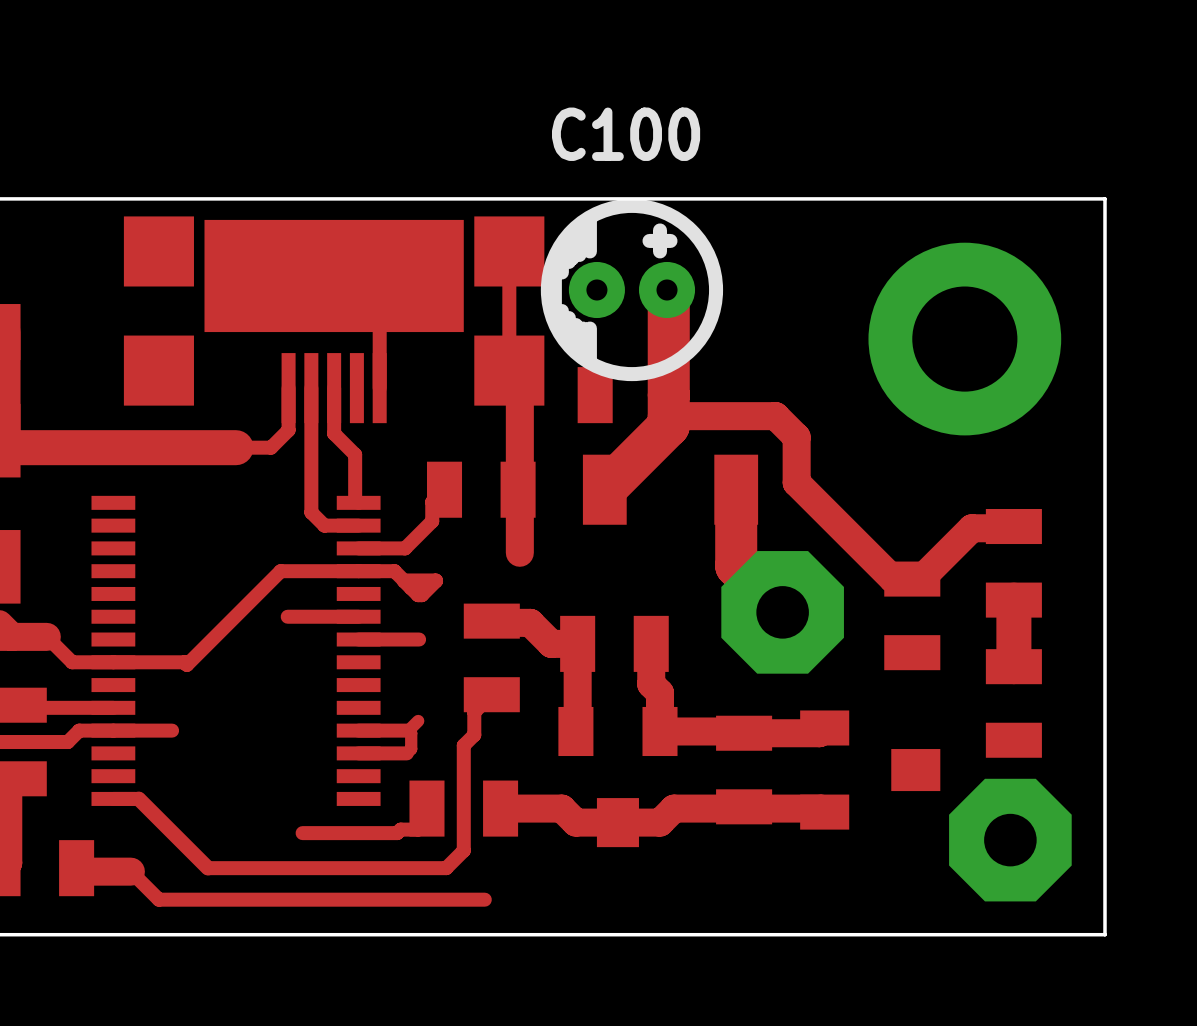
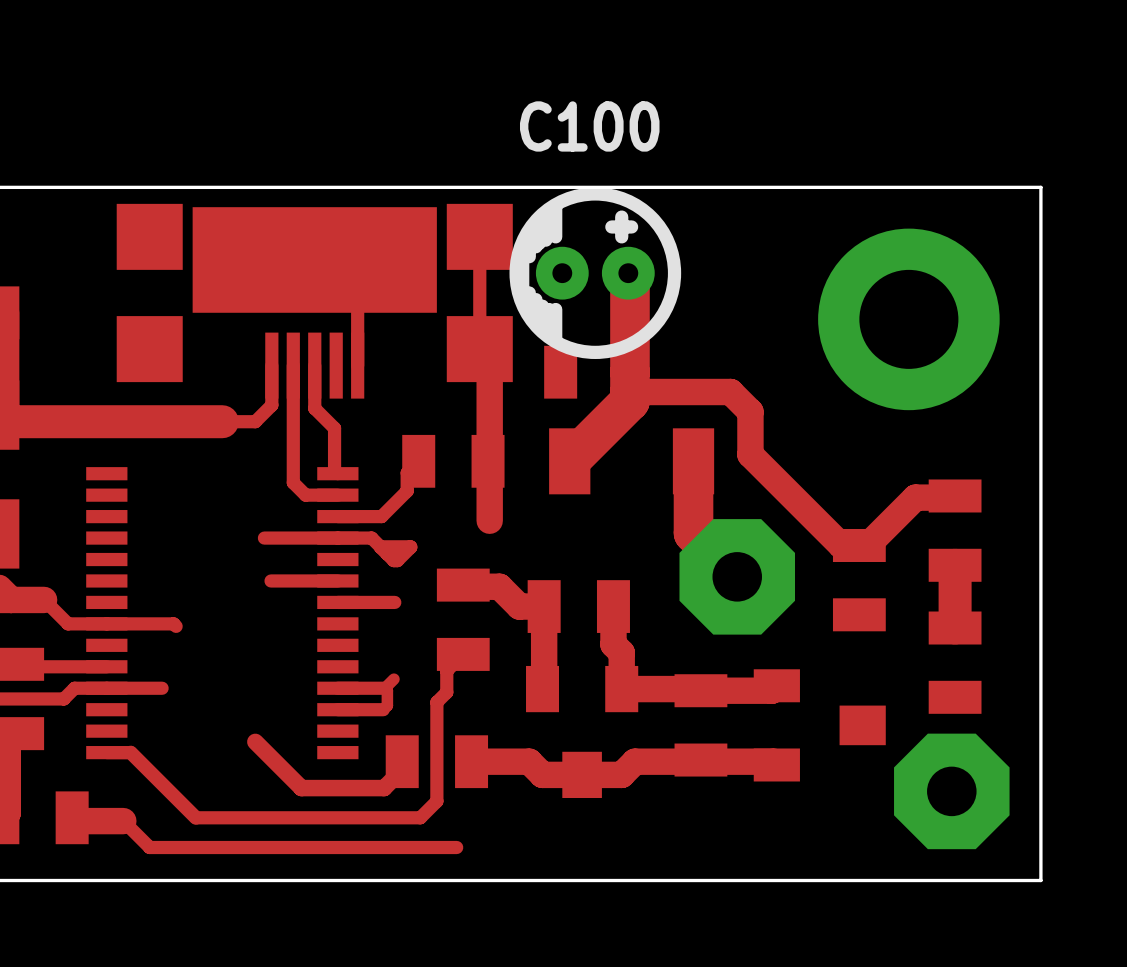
top track: (280, 571) (186, 664) -> none
top track: (418, 826) (418, 829) (400, 829) (397, 833) (302, 833) -> (393, 778) (384, 788) (301, 788) (255, 741)

